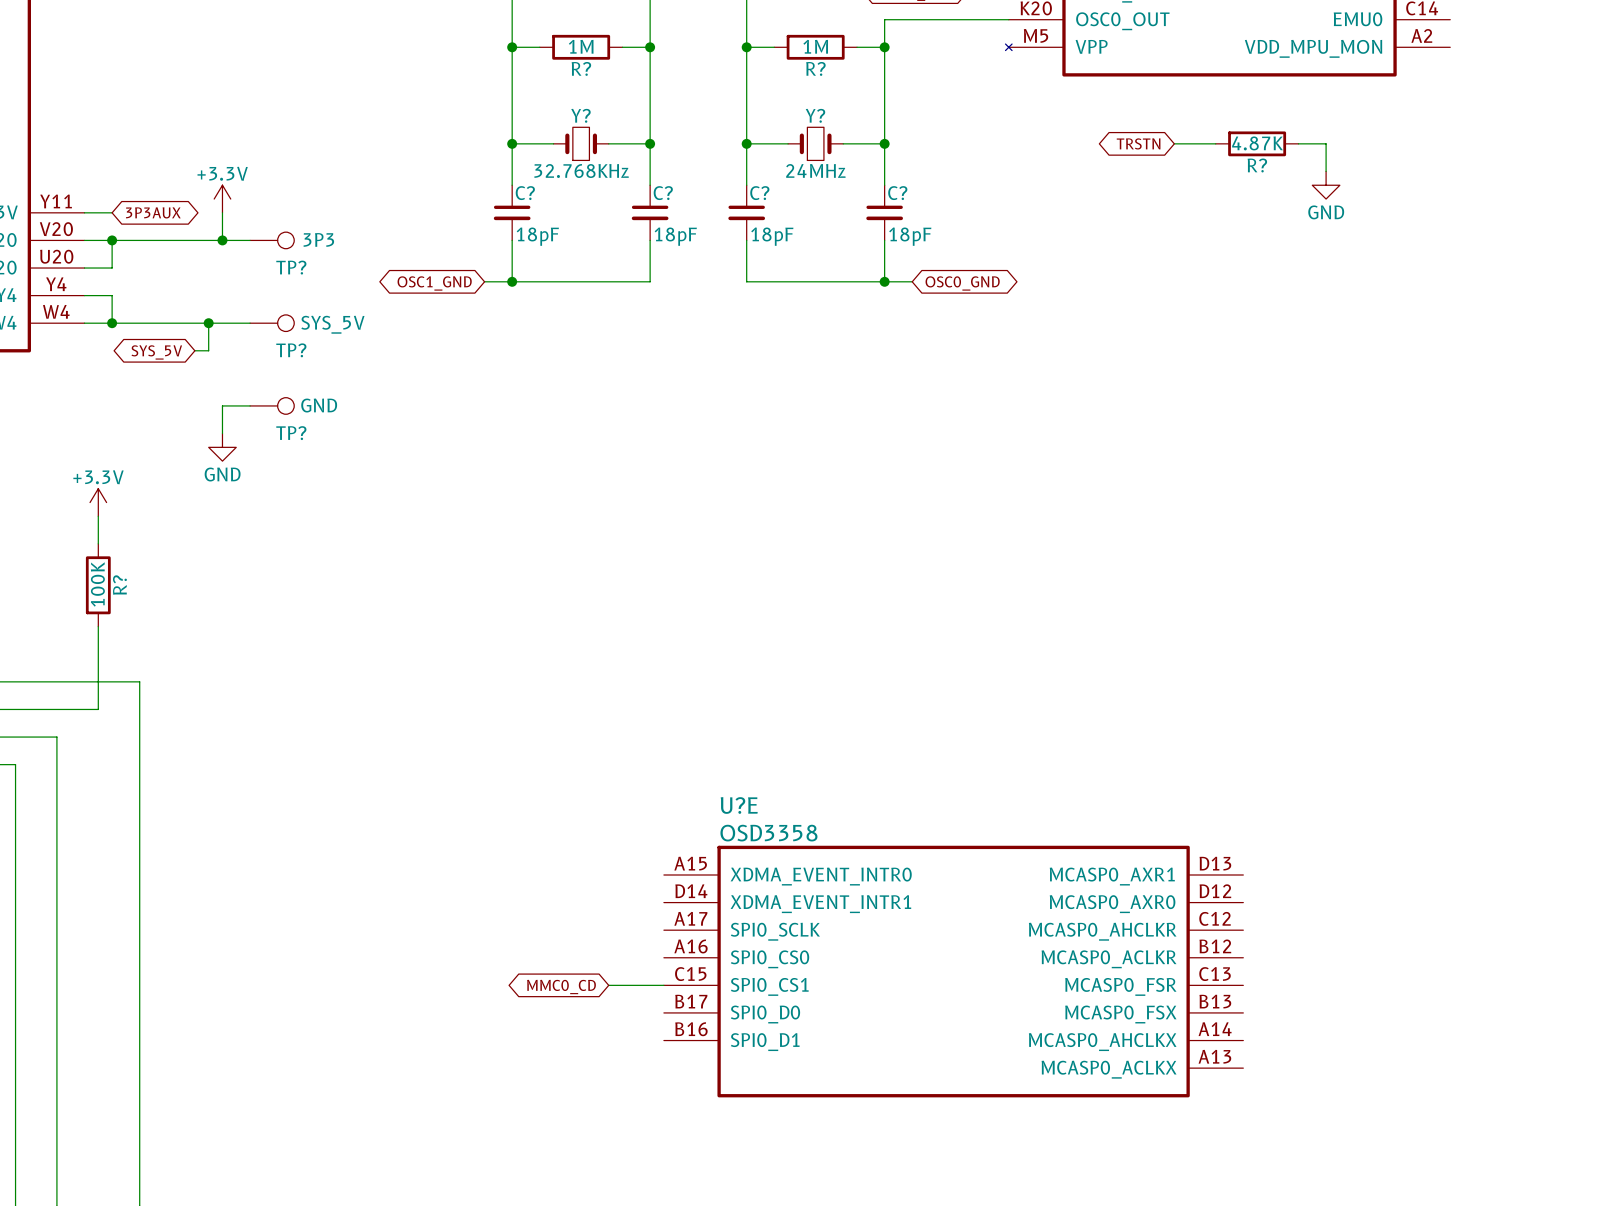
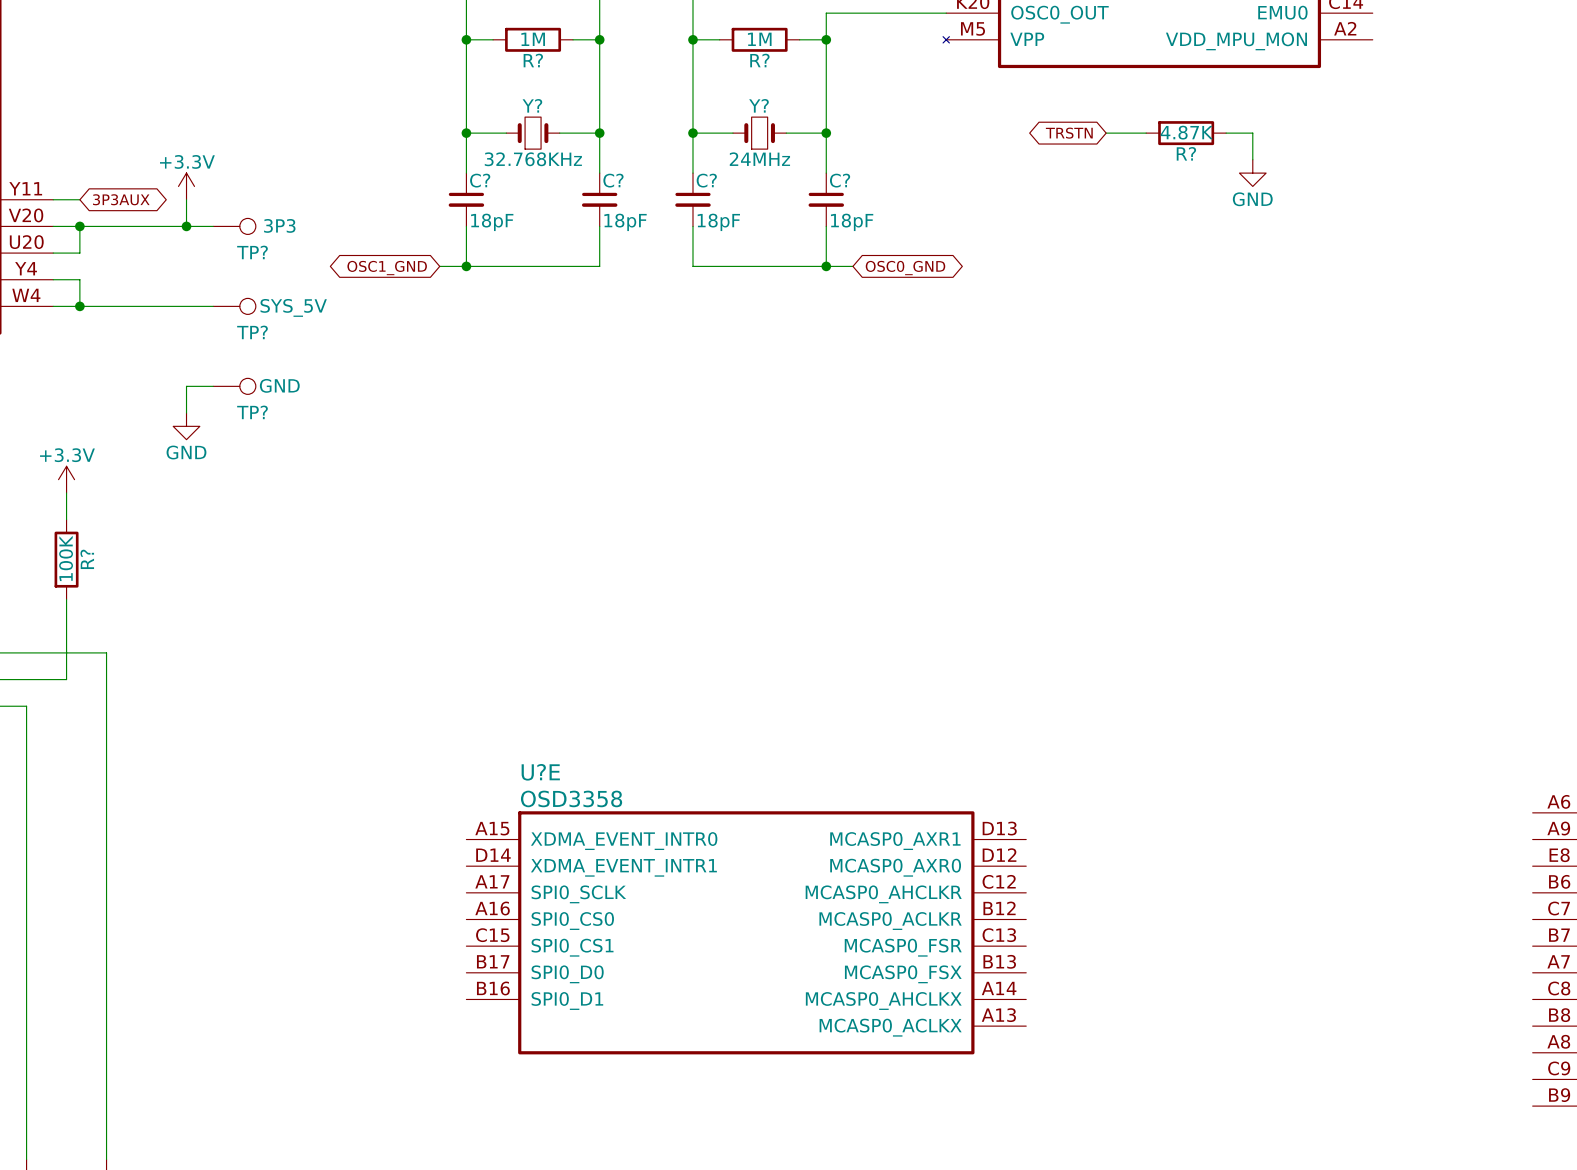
wire: (208, 323) (208, 350) (194, 350) -> none
junction: (208, 323) -> none
global label: SYS_5V (156, 352) -> none
U?E position: (953, 971) -> (746, 932)
wire: (608, 985) (663, 985) -> none
global label: MMC0_CD (561, 987) -> none

